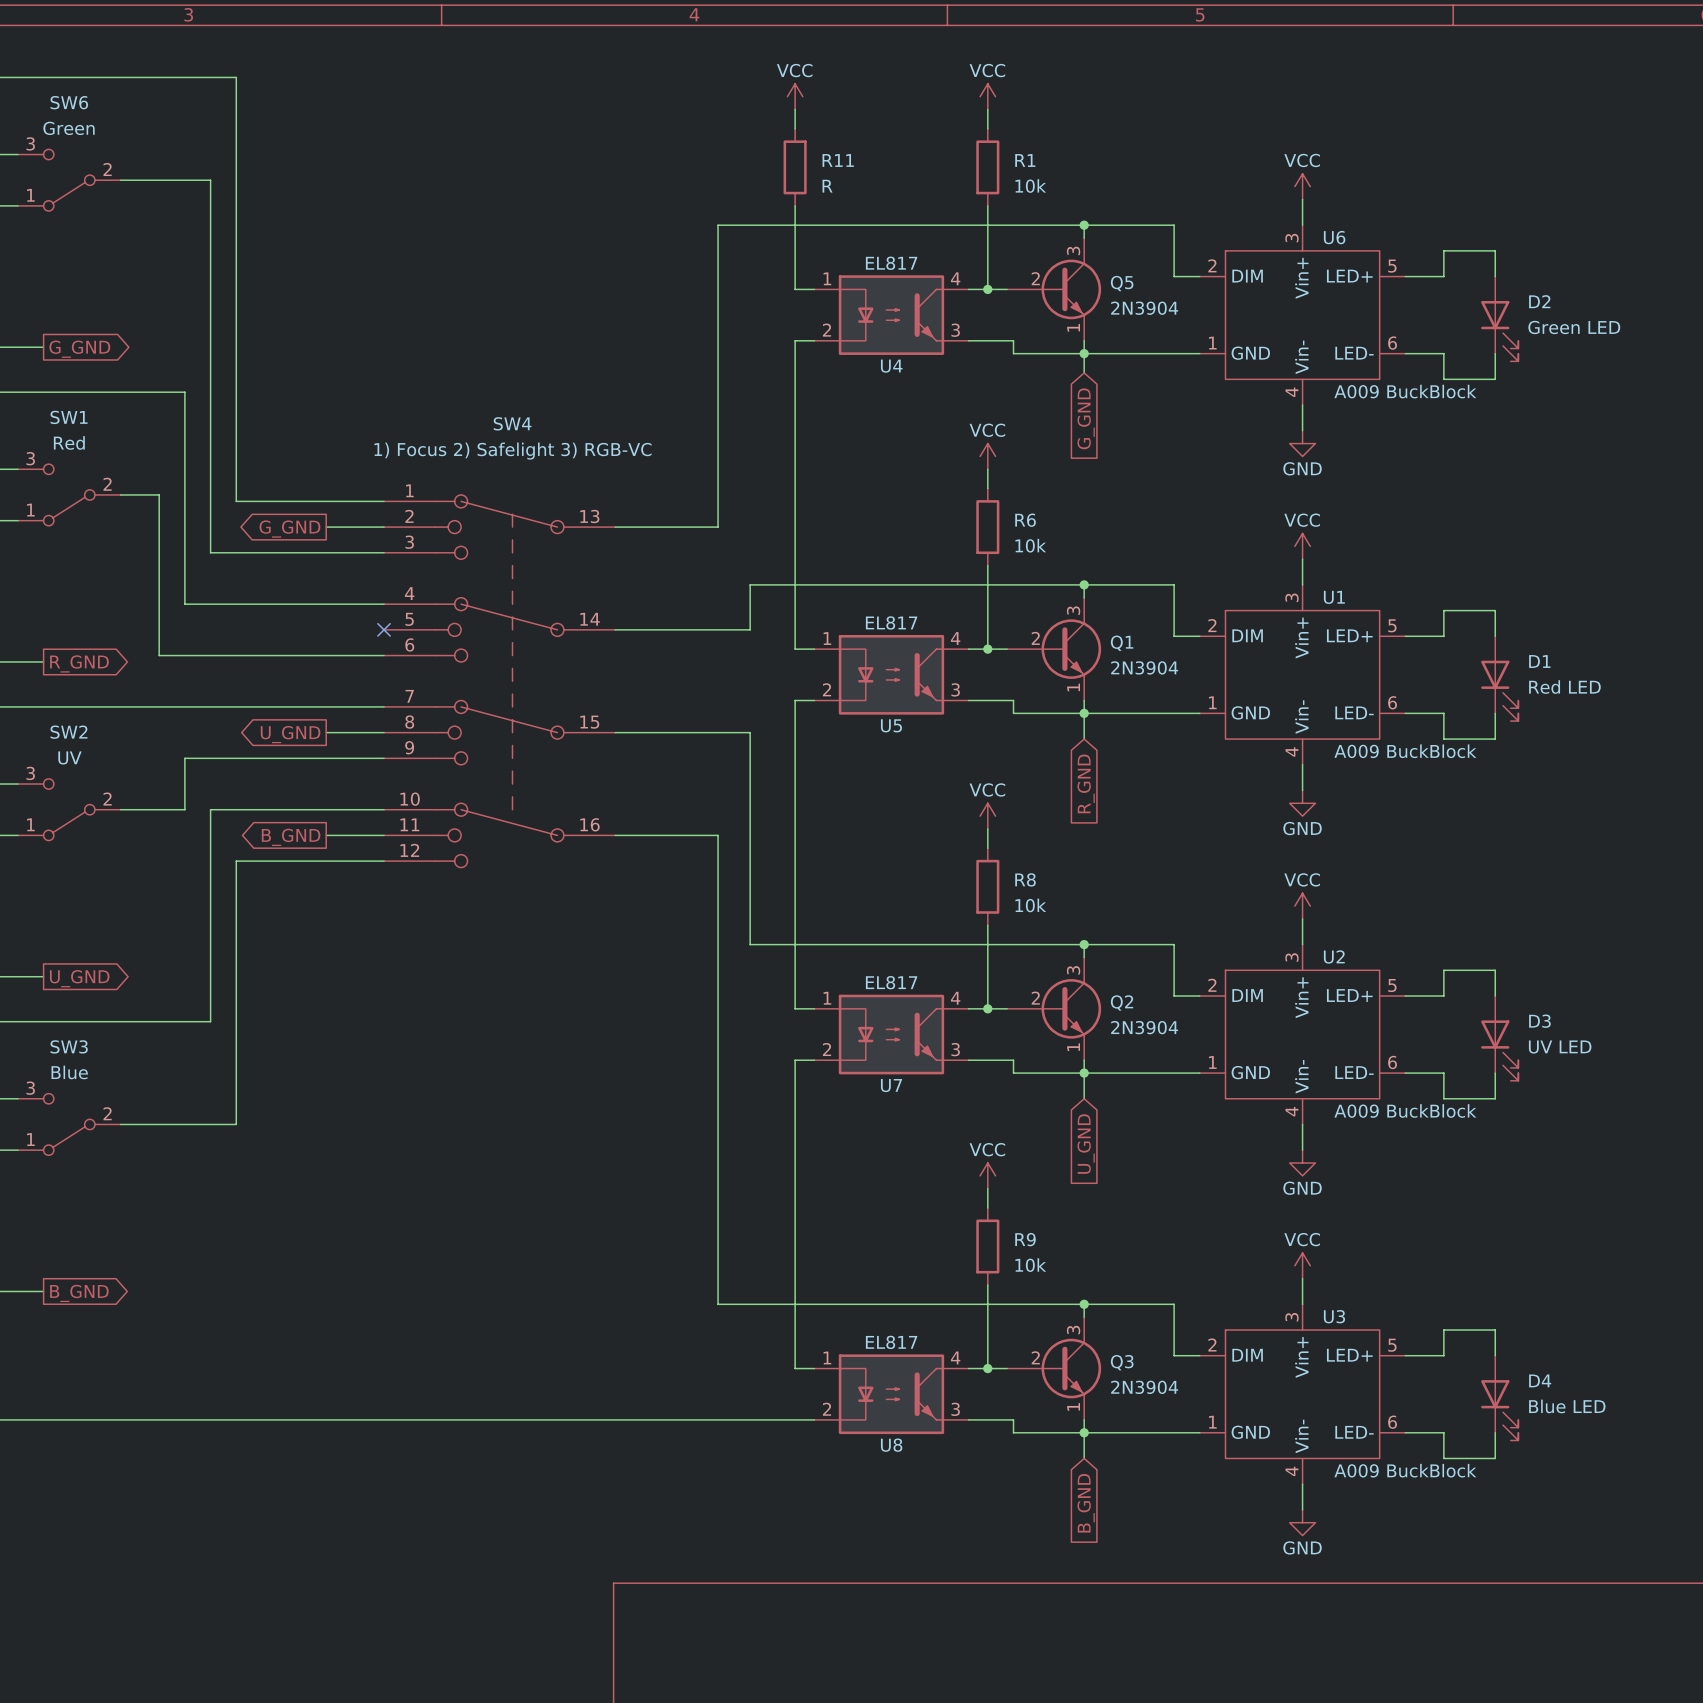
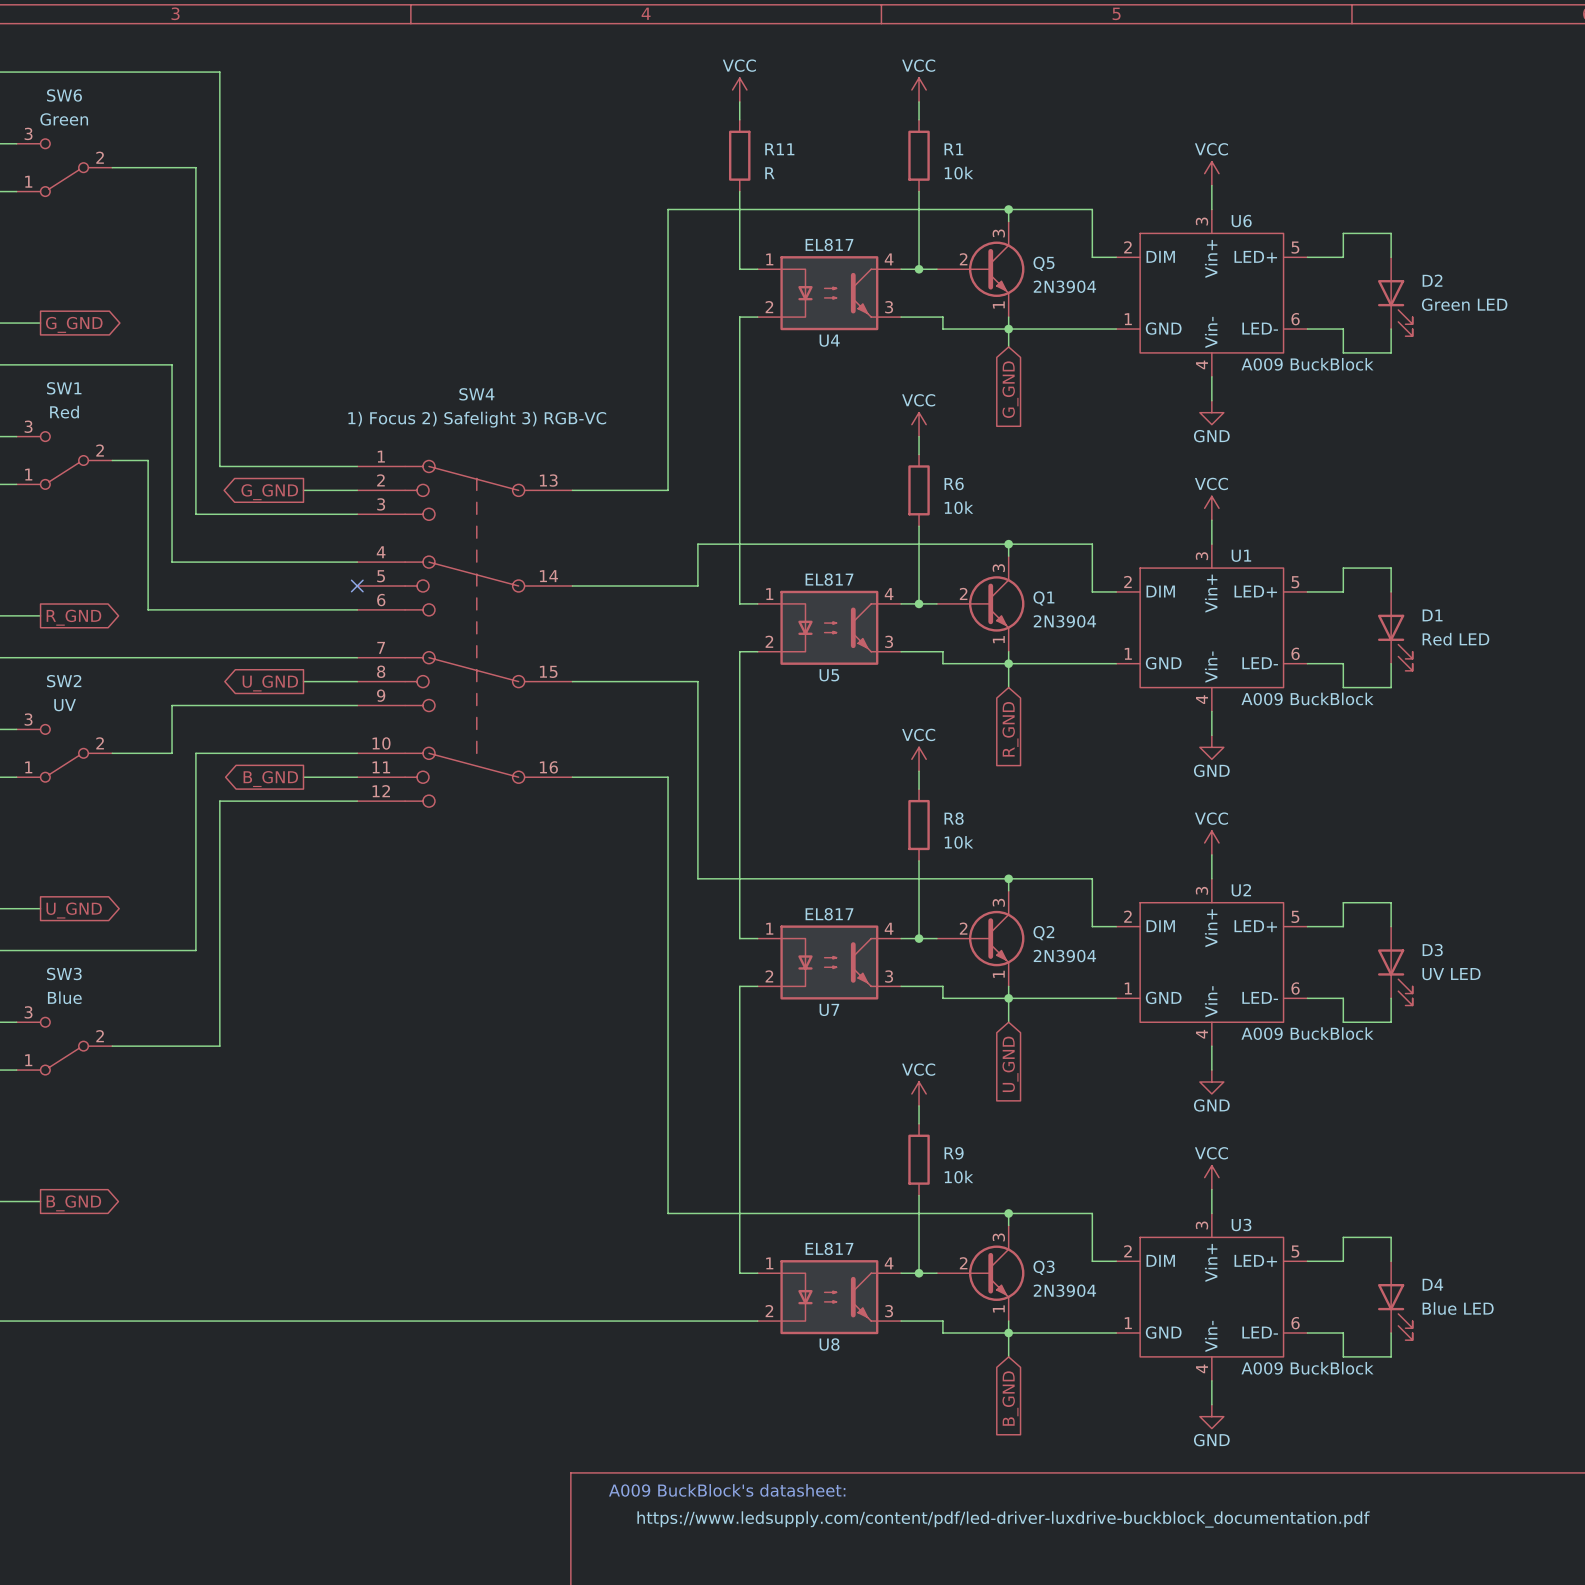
text: none -> A009 BuckBlock's datasheet: (727, 1490)
U3 text: none -> https://www.ledsupply.com/content/pdf/led-driver-luxdrive-buckblock_documentation.pdf (1003, 1519)

